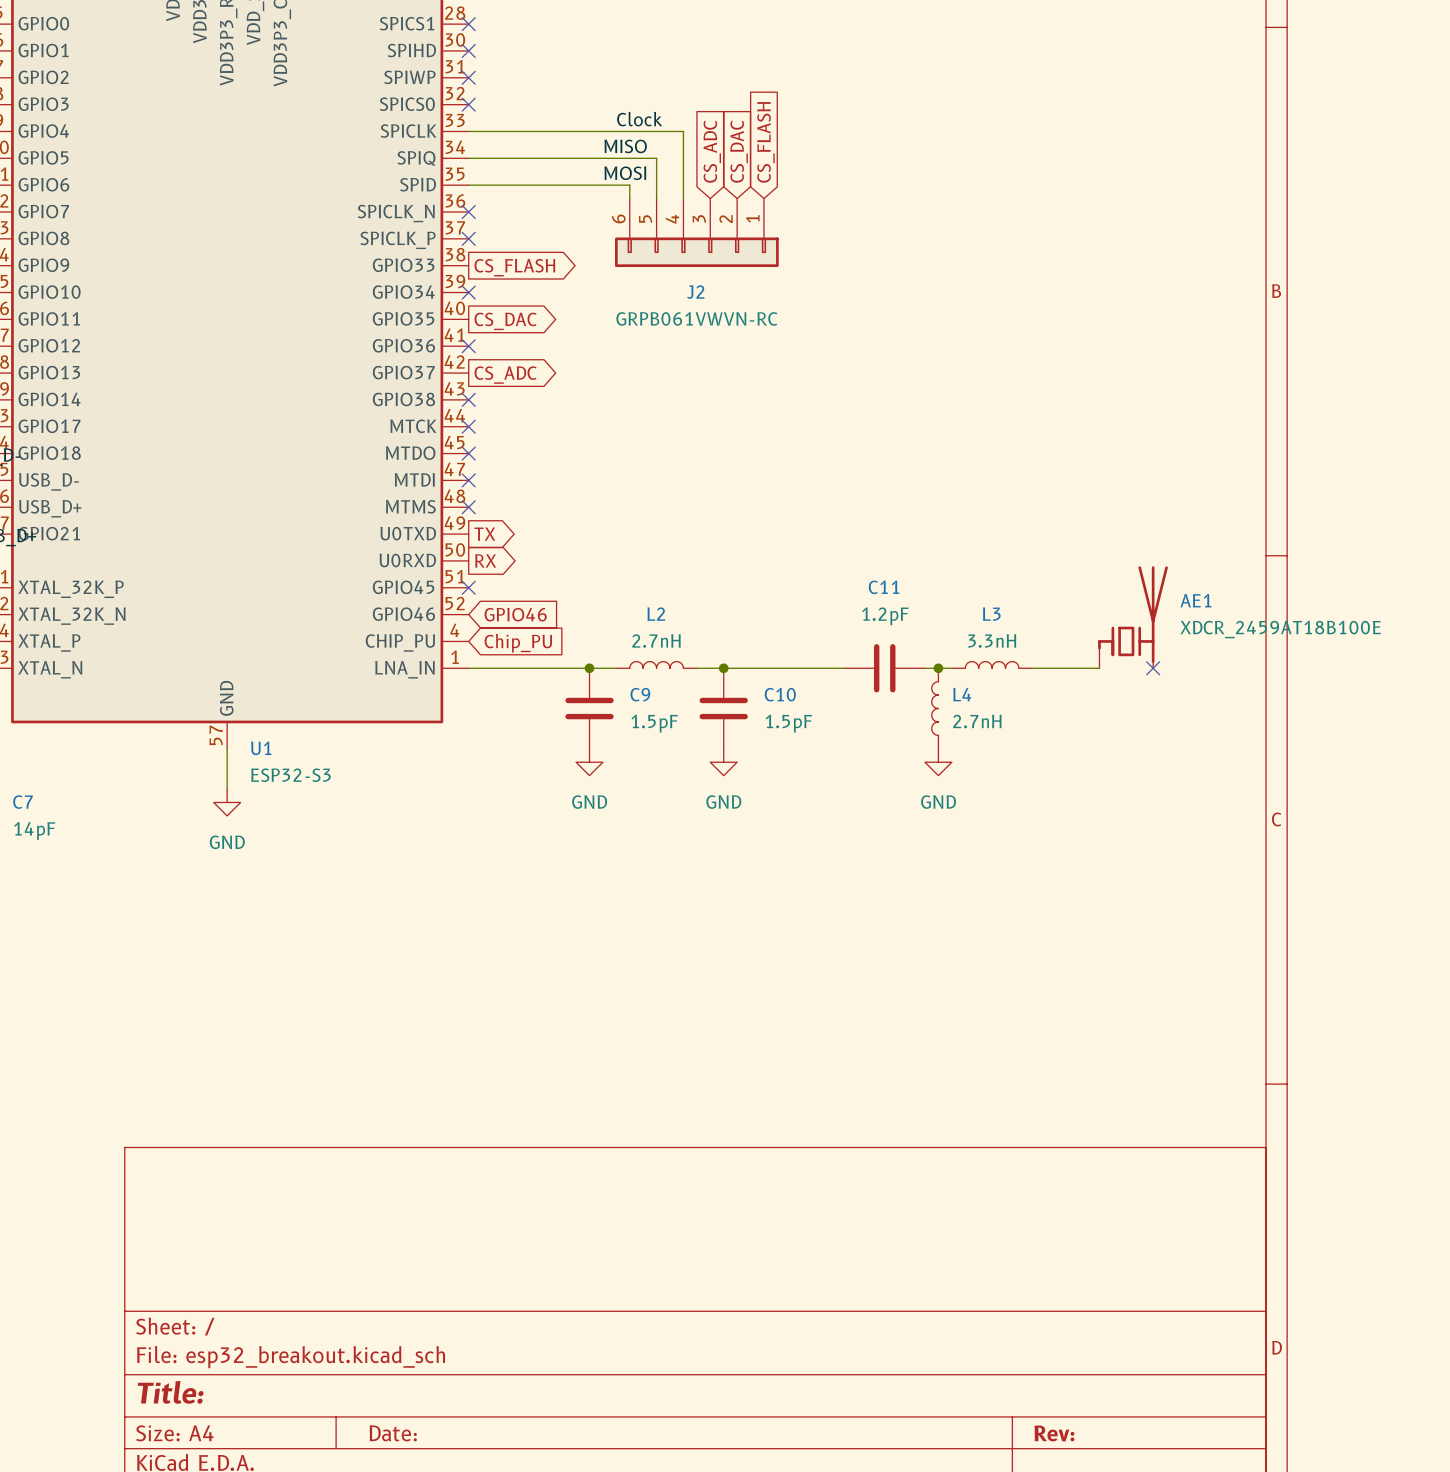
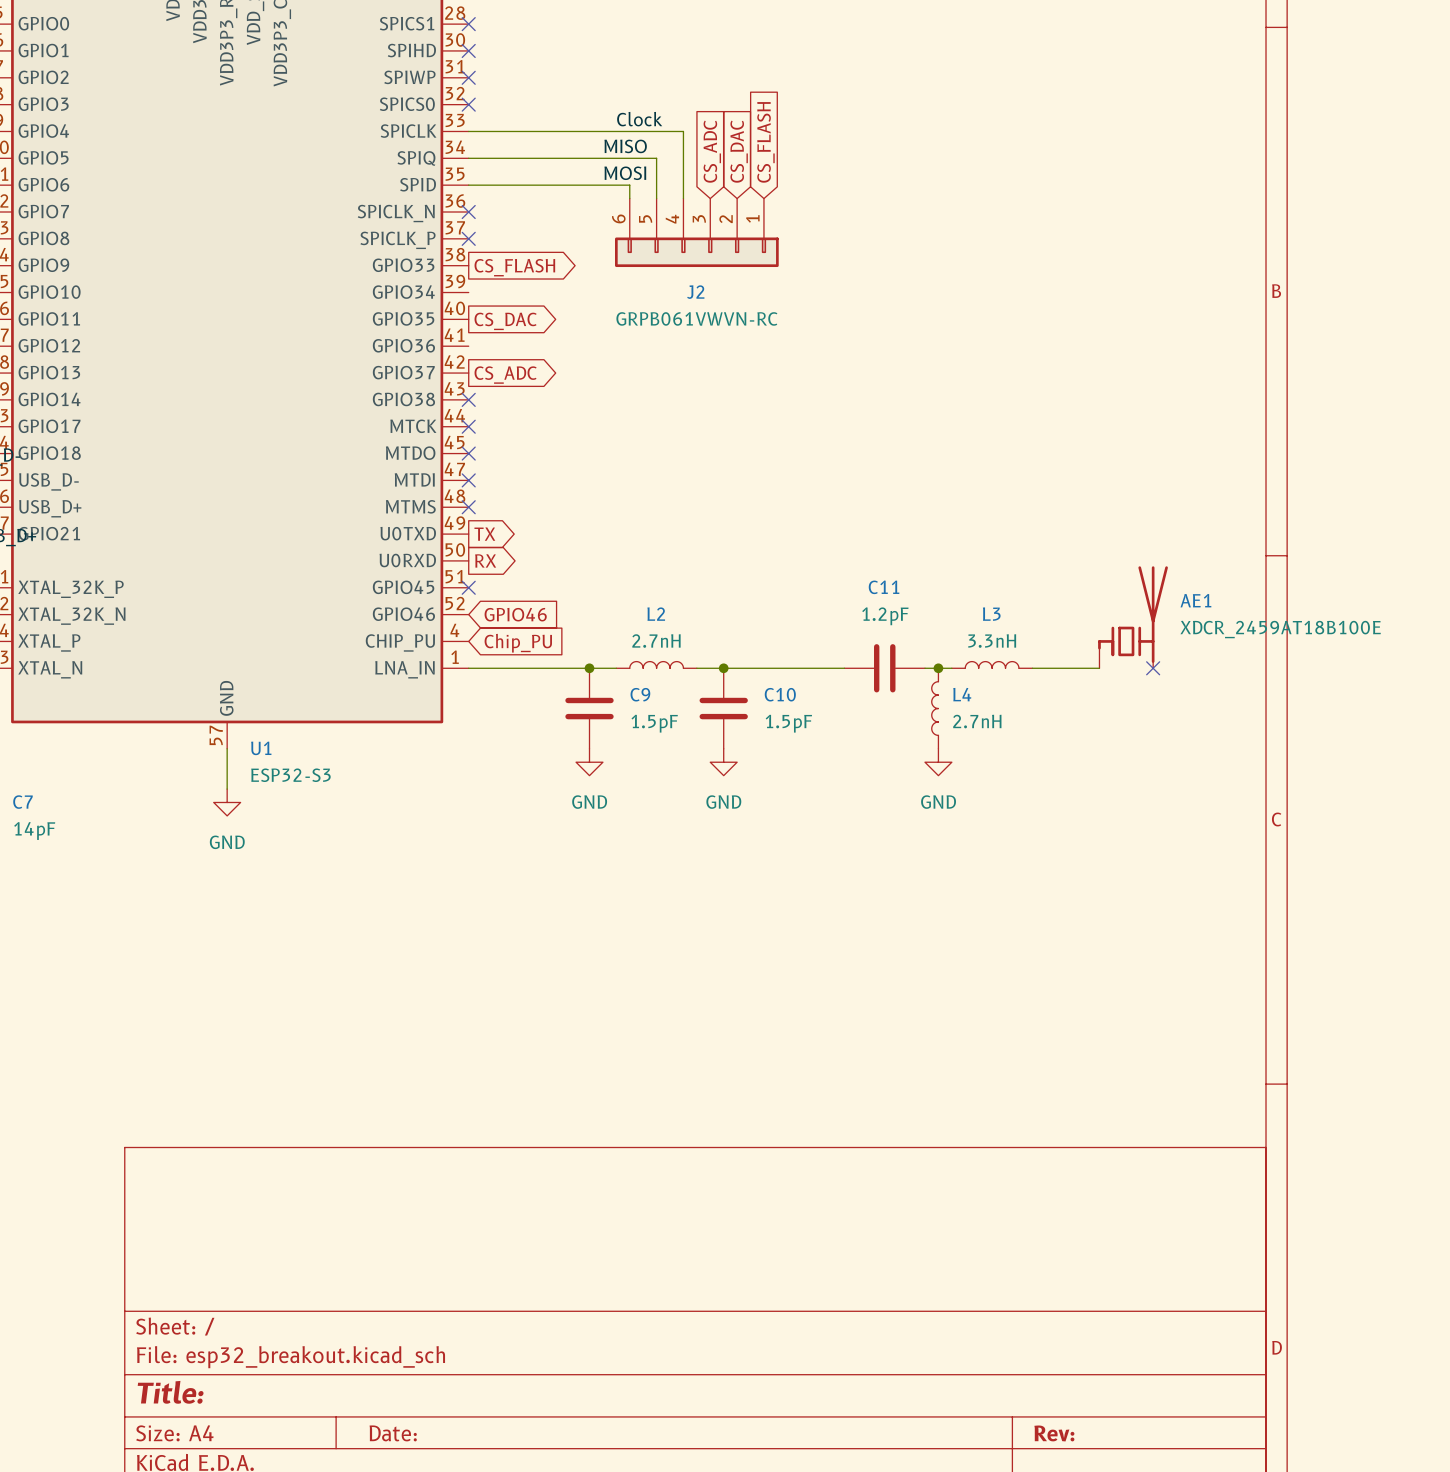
no-connect mark: (468, 292) -> none
no-connect mark: (468, 346) -> none

